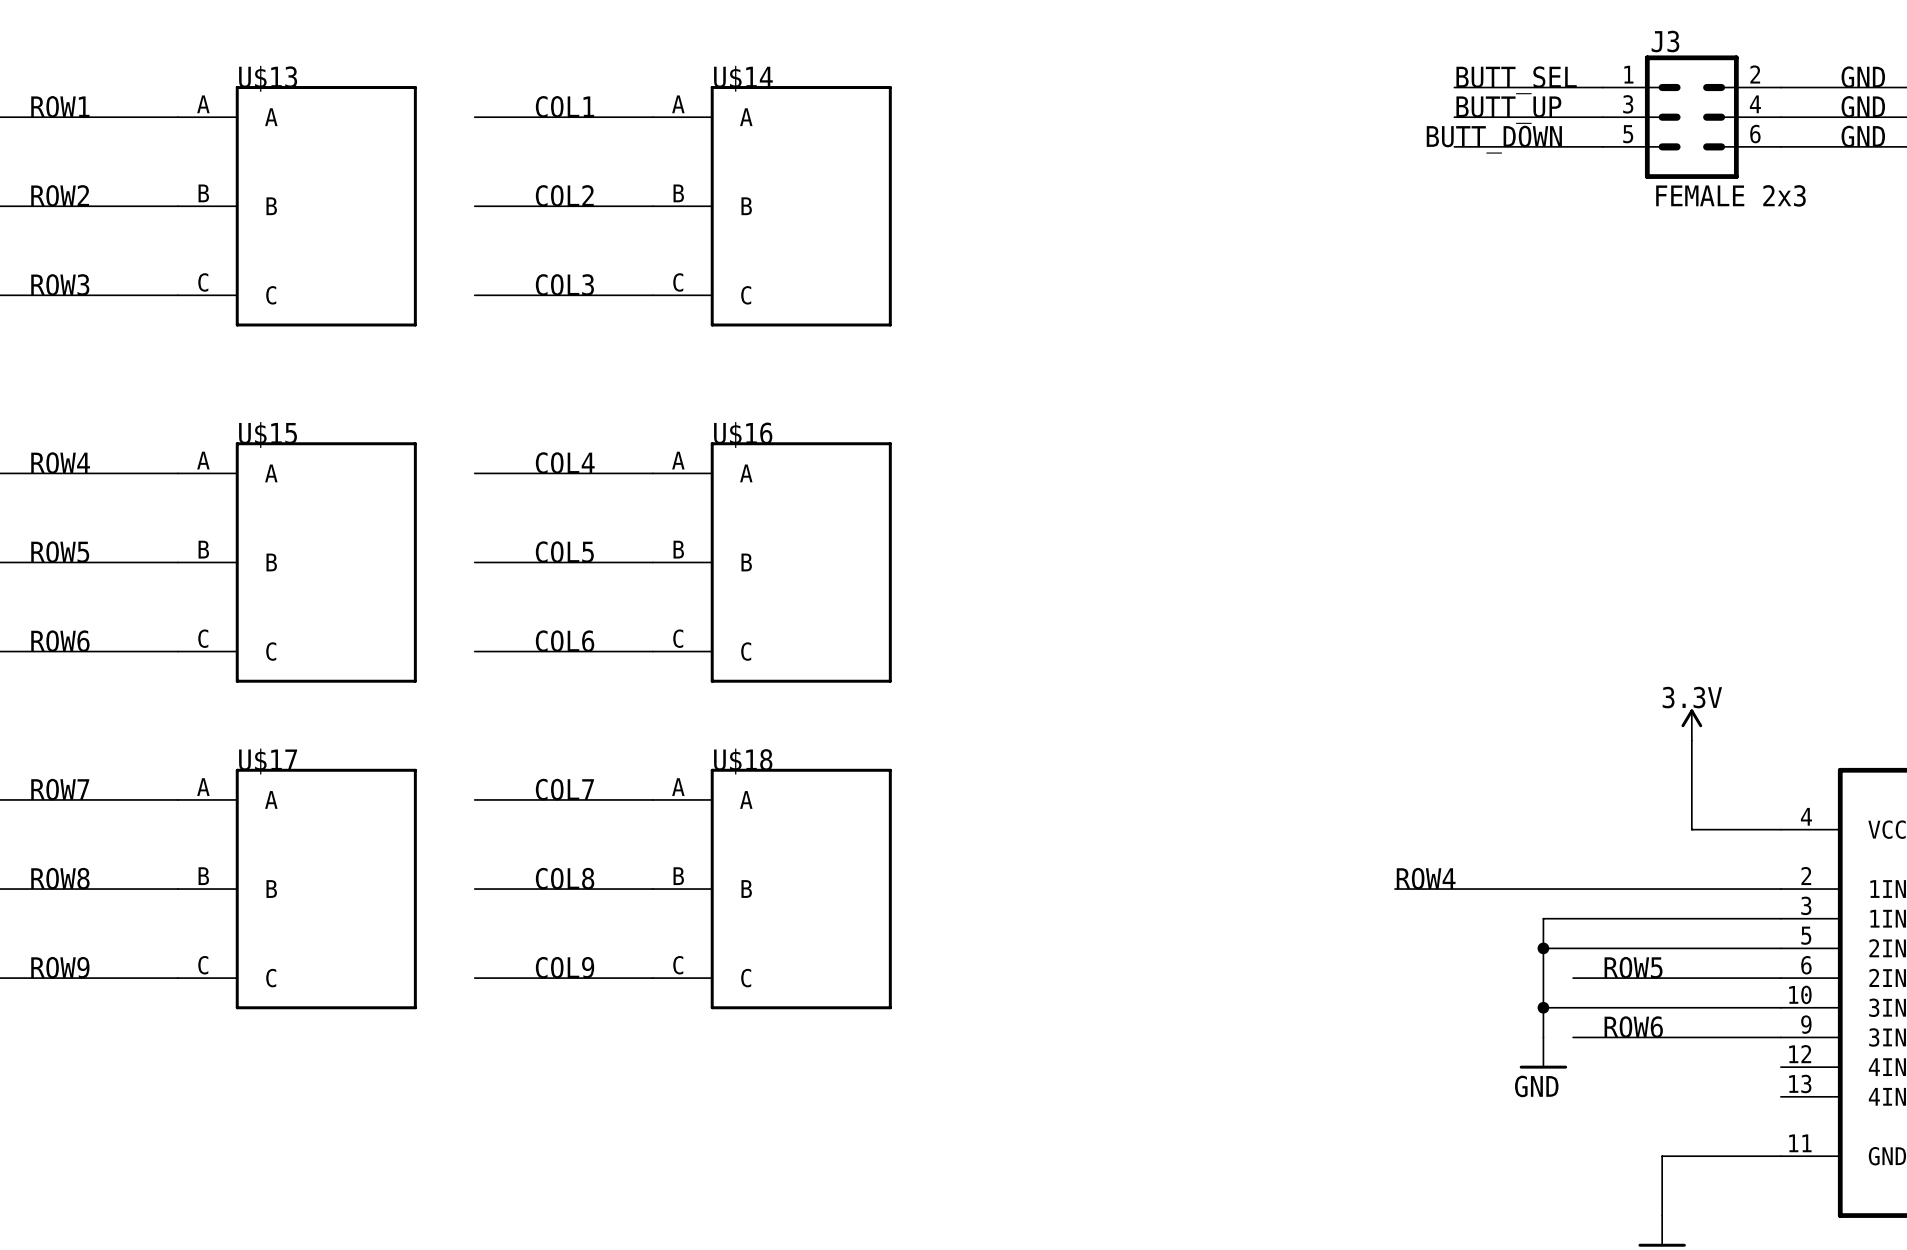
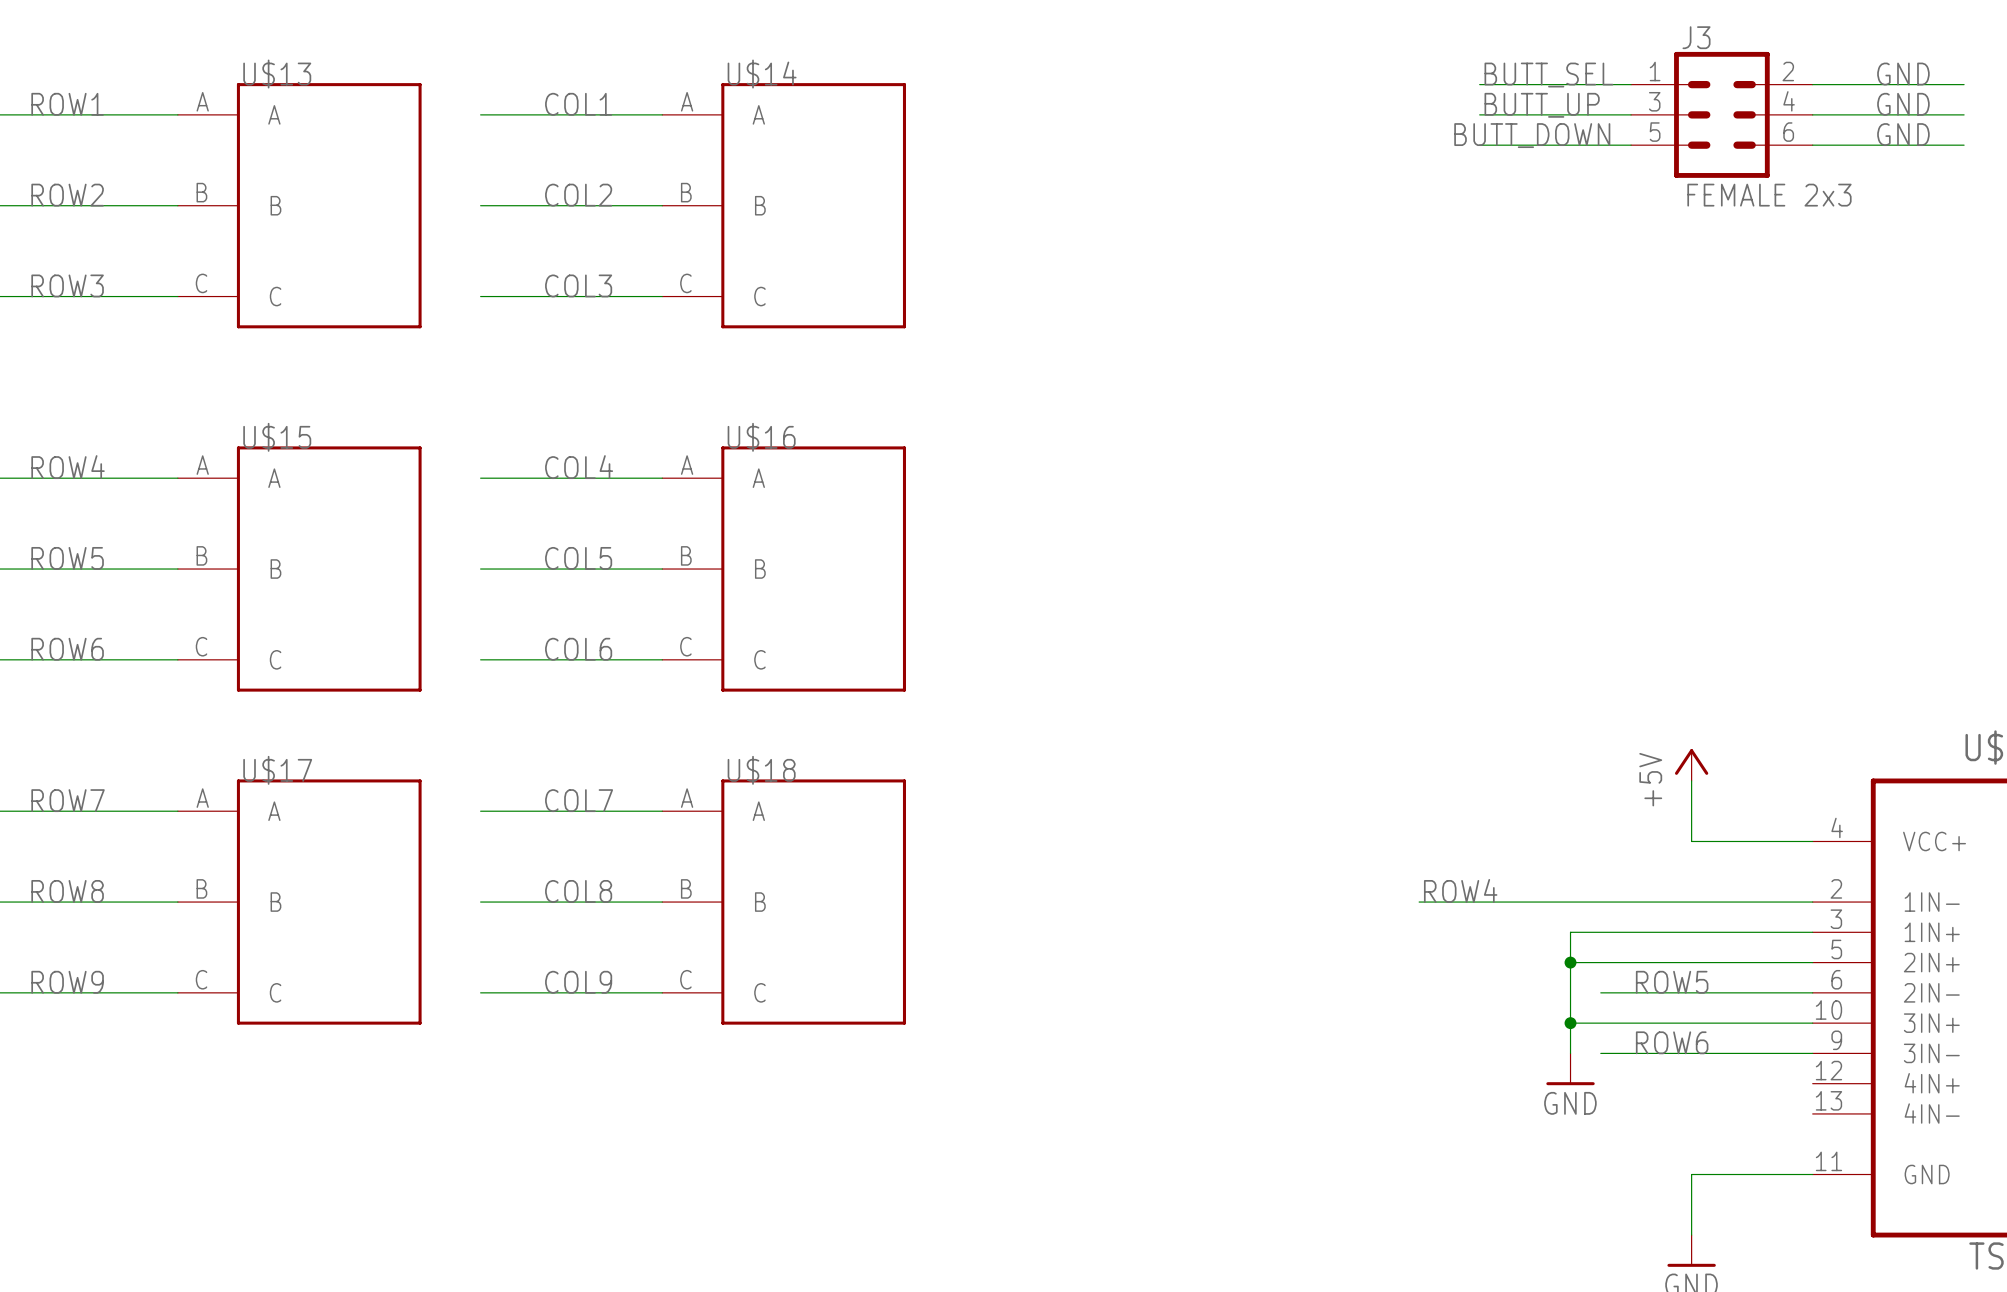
power symbol: 3.3V (1691, 725) -> none
wire: (1691, 740) (1691, 829) -> (1691, 780) (1691, 841) (1721, 841)
power symbol: none -> +5V (1691, 765)

